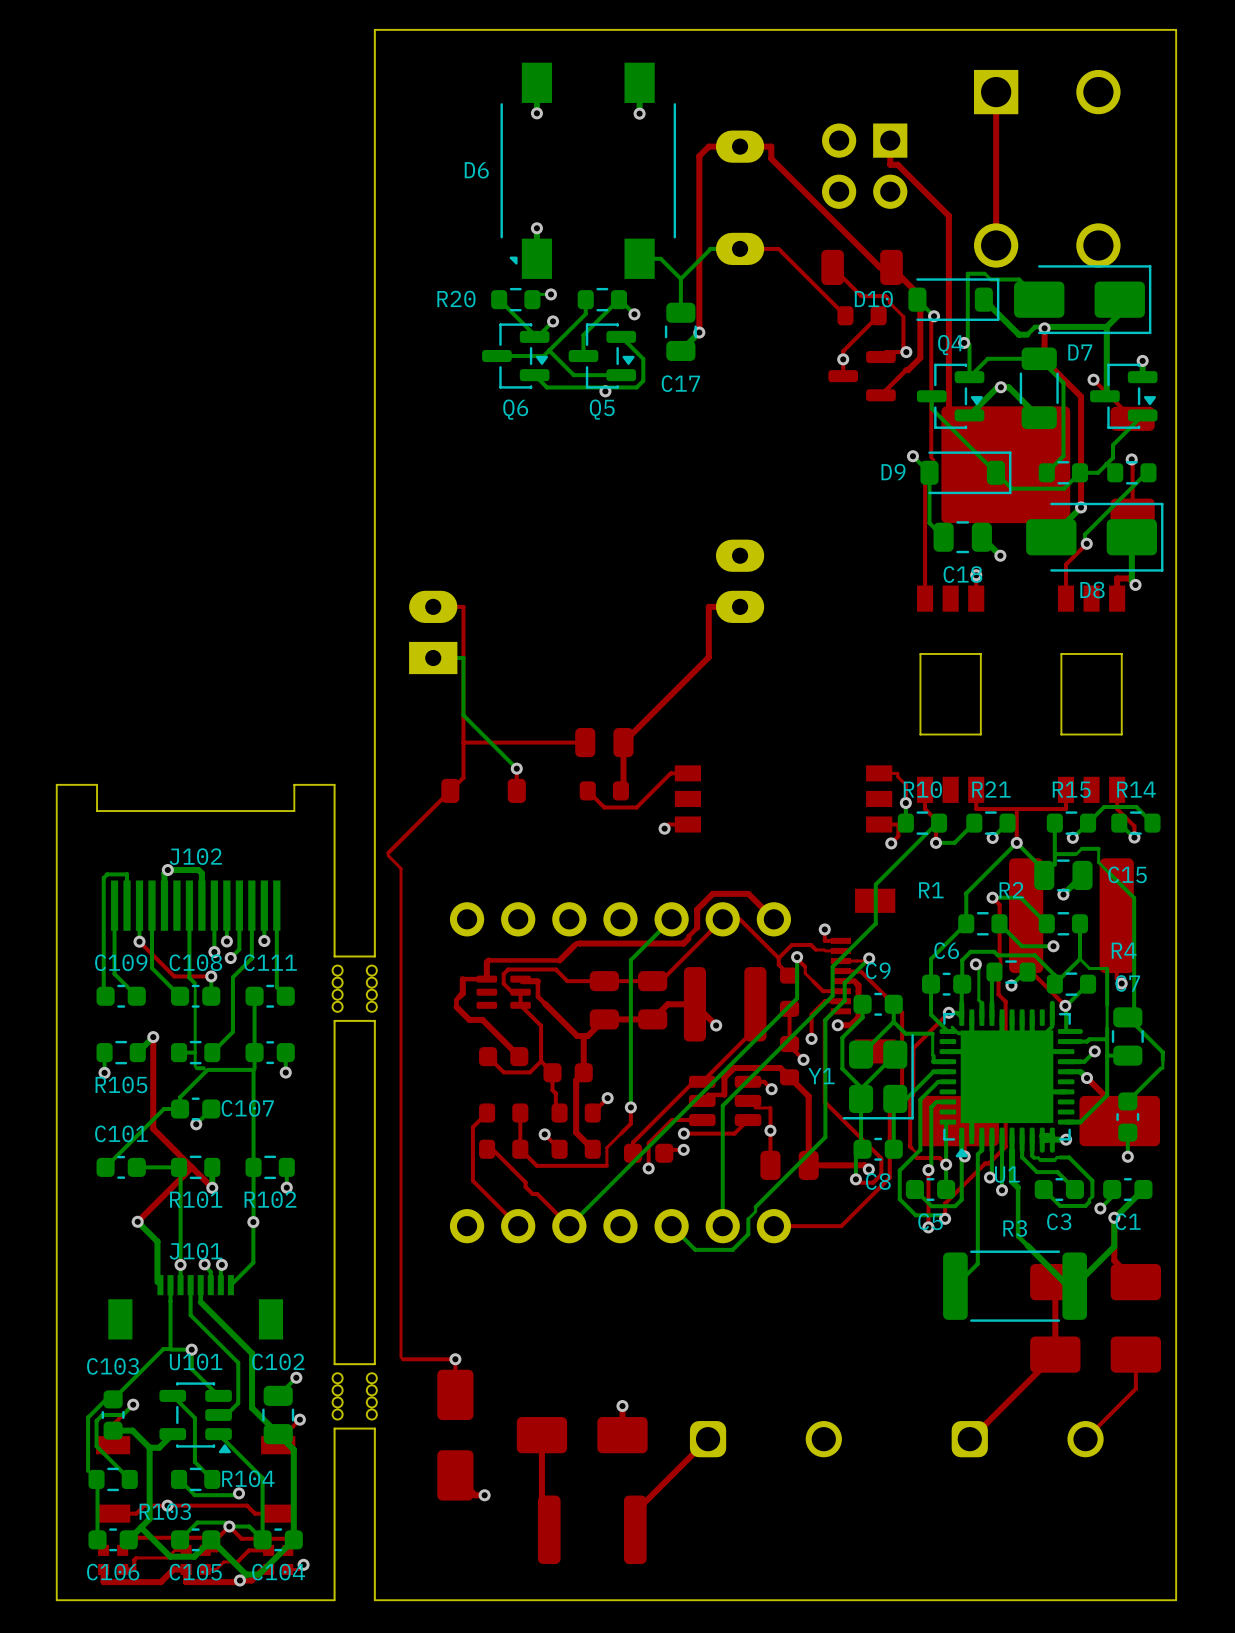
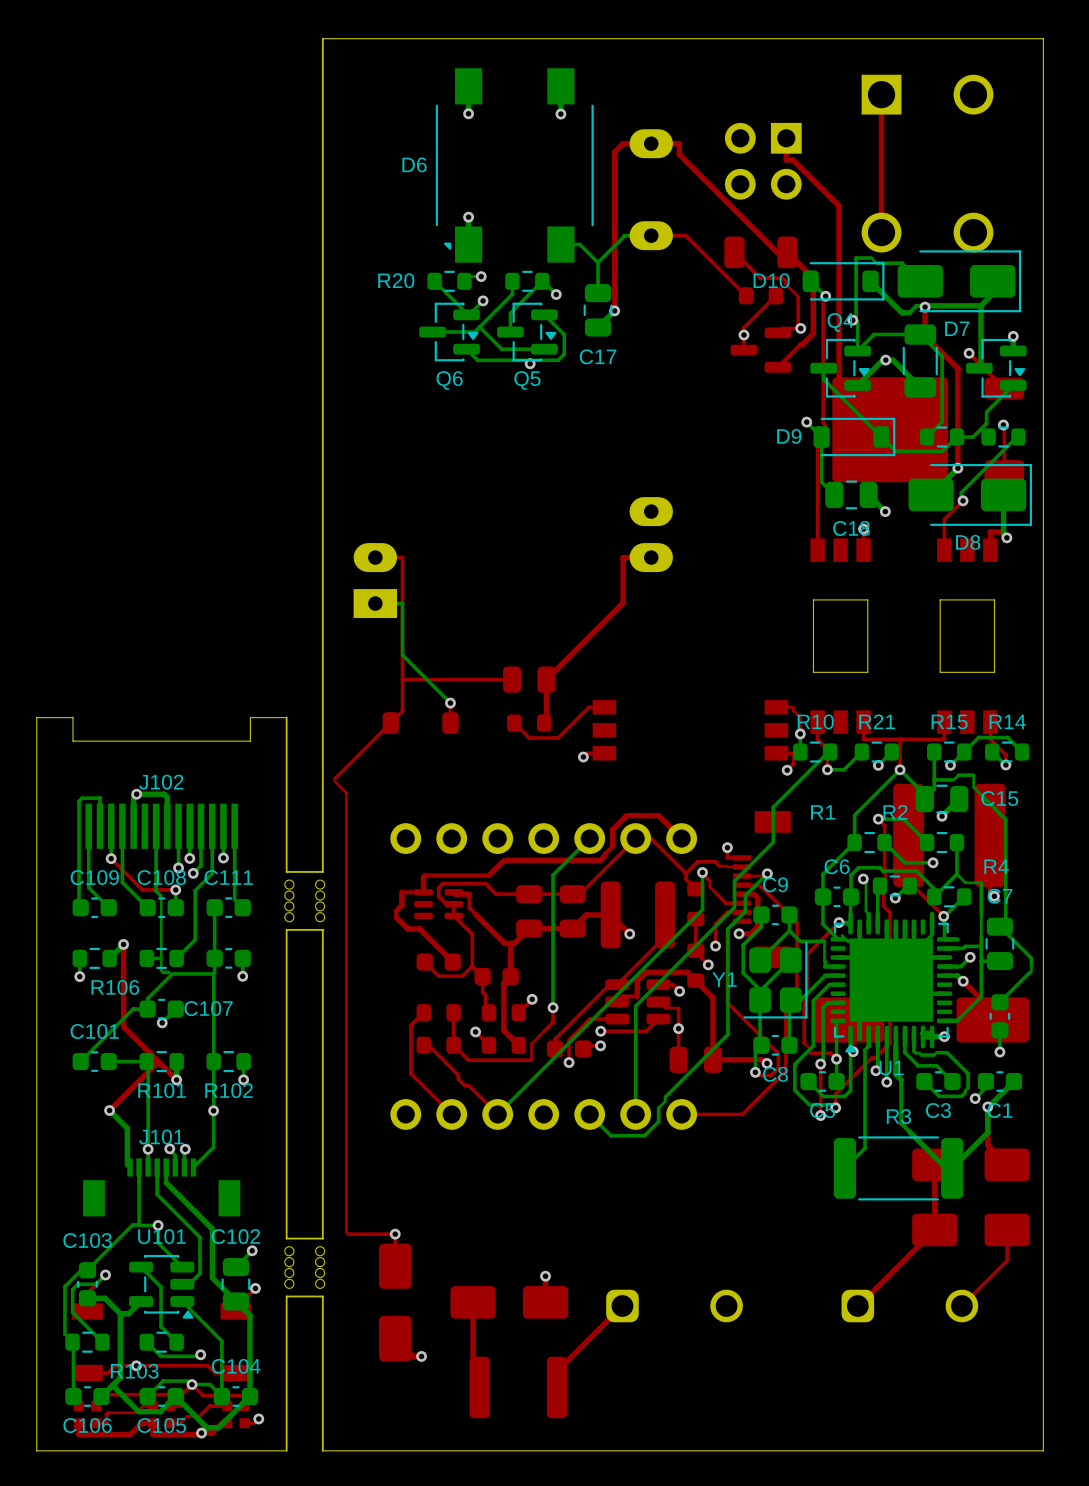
R105 name: R105 (121, 1084) -> none
R106 name: none -> R106 (115, 987)
R104 name: R104 (248, 1478) -> none
C104 name position: C104 (278, 1572) -> C104 (236, 1366)

